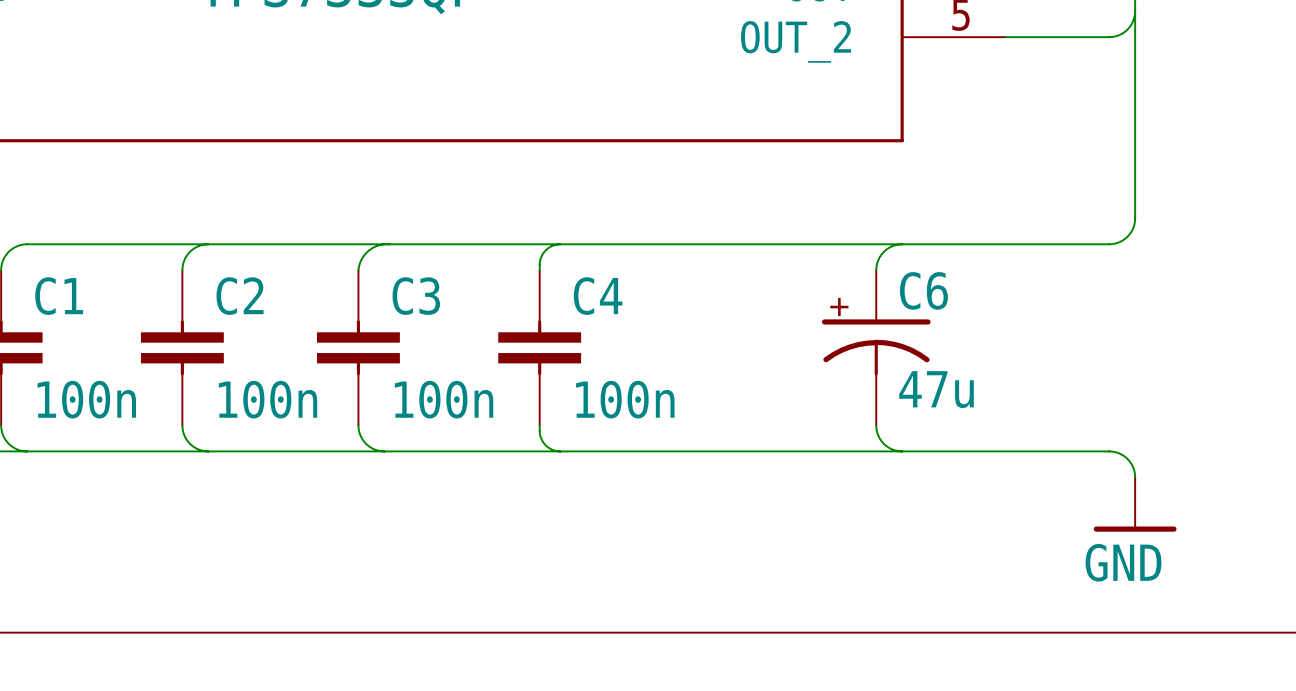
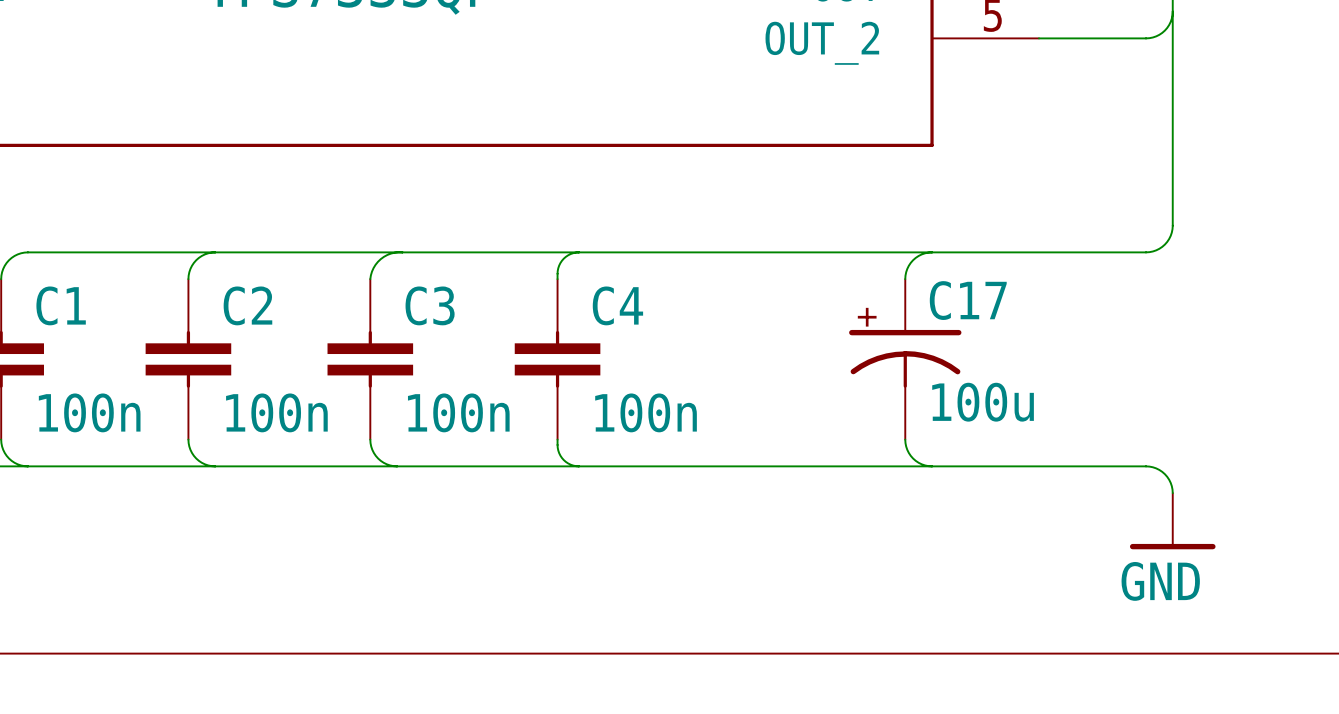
C6 name: C6 (923, 290) -> C17 (968, 300)
C6 value: 47u (936, 389) -> 100u (983, 402)

